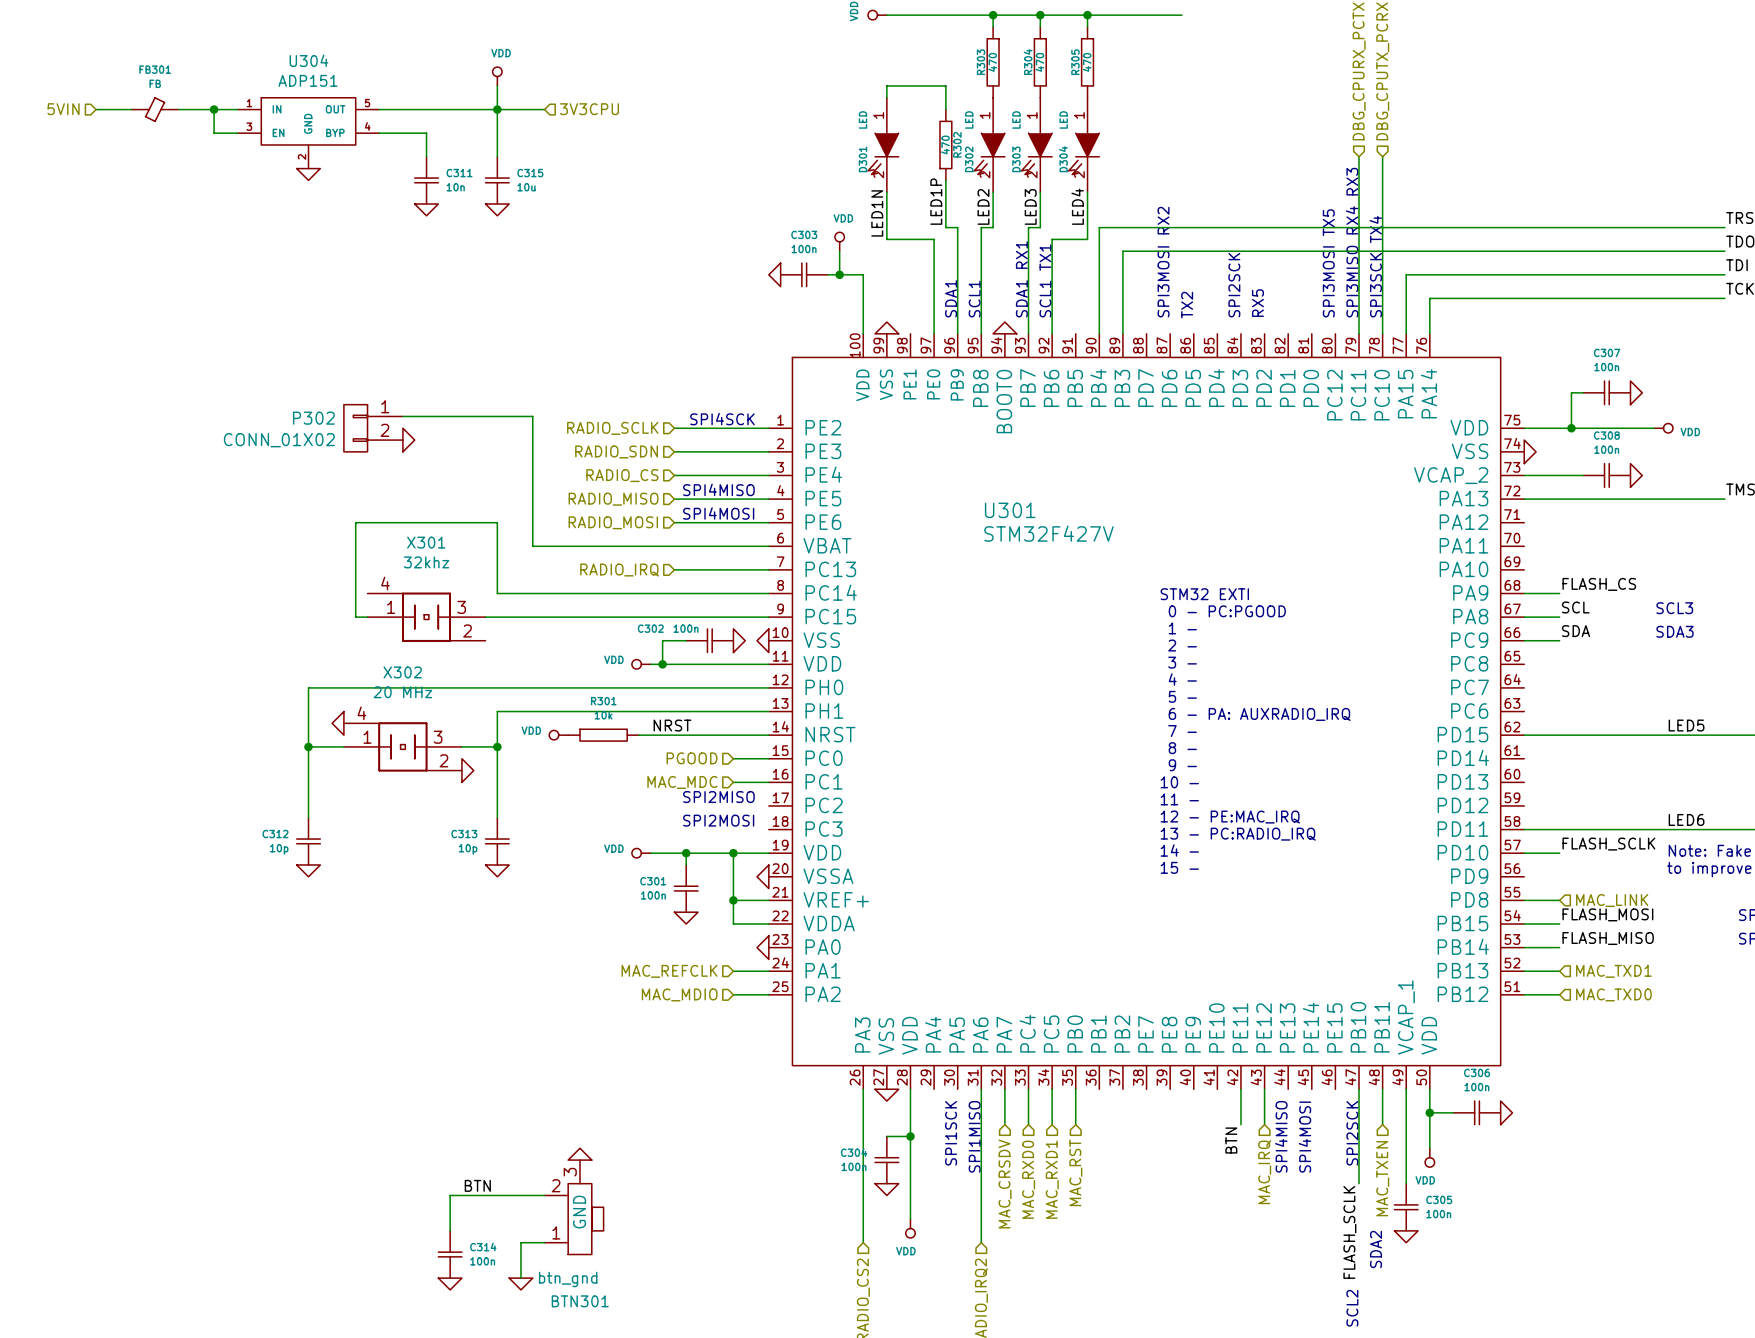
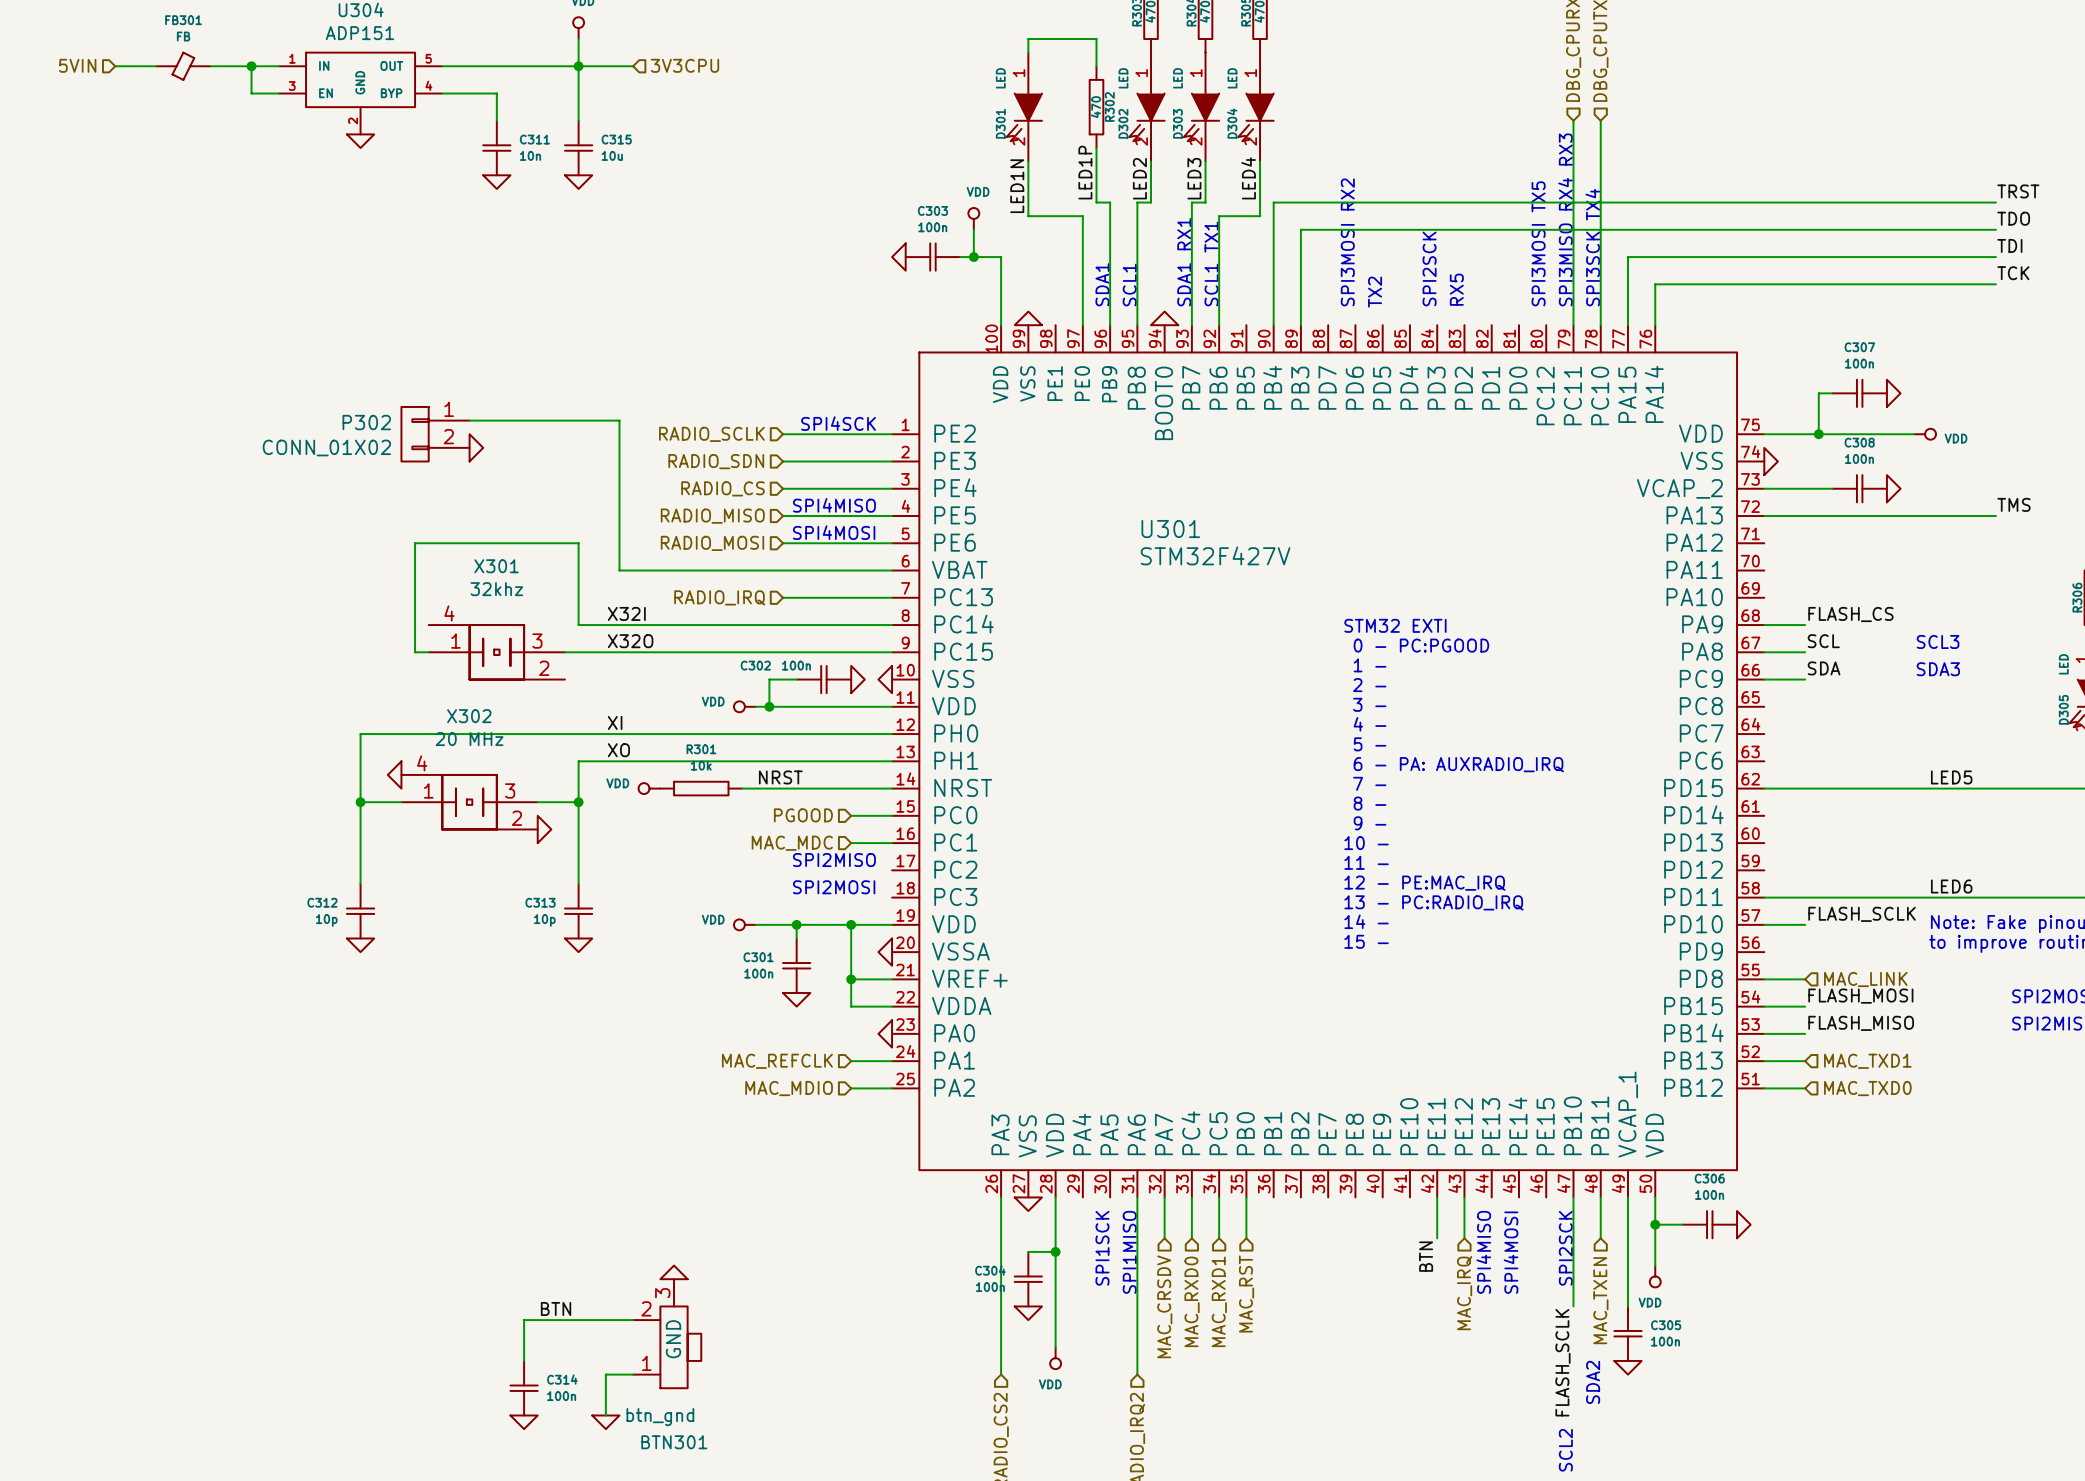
label: none -> X32I (626, 613)
label: none -> X32O (630, 641)
label: none -> XI (615, 722)
label: none -> XO (618, 750)

